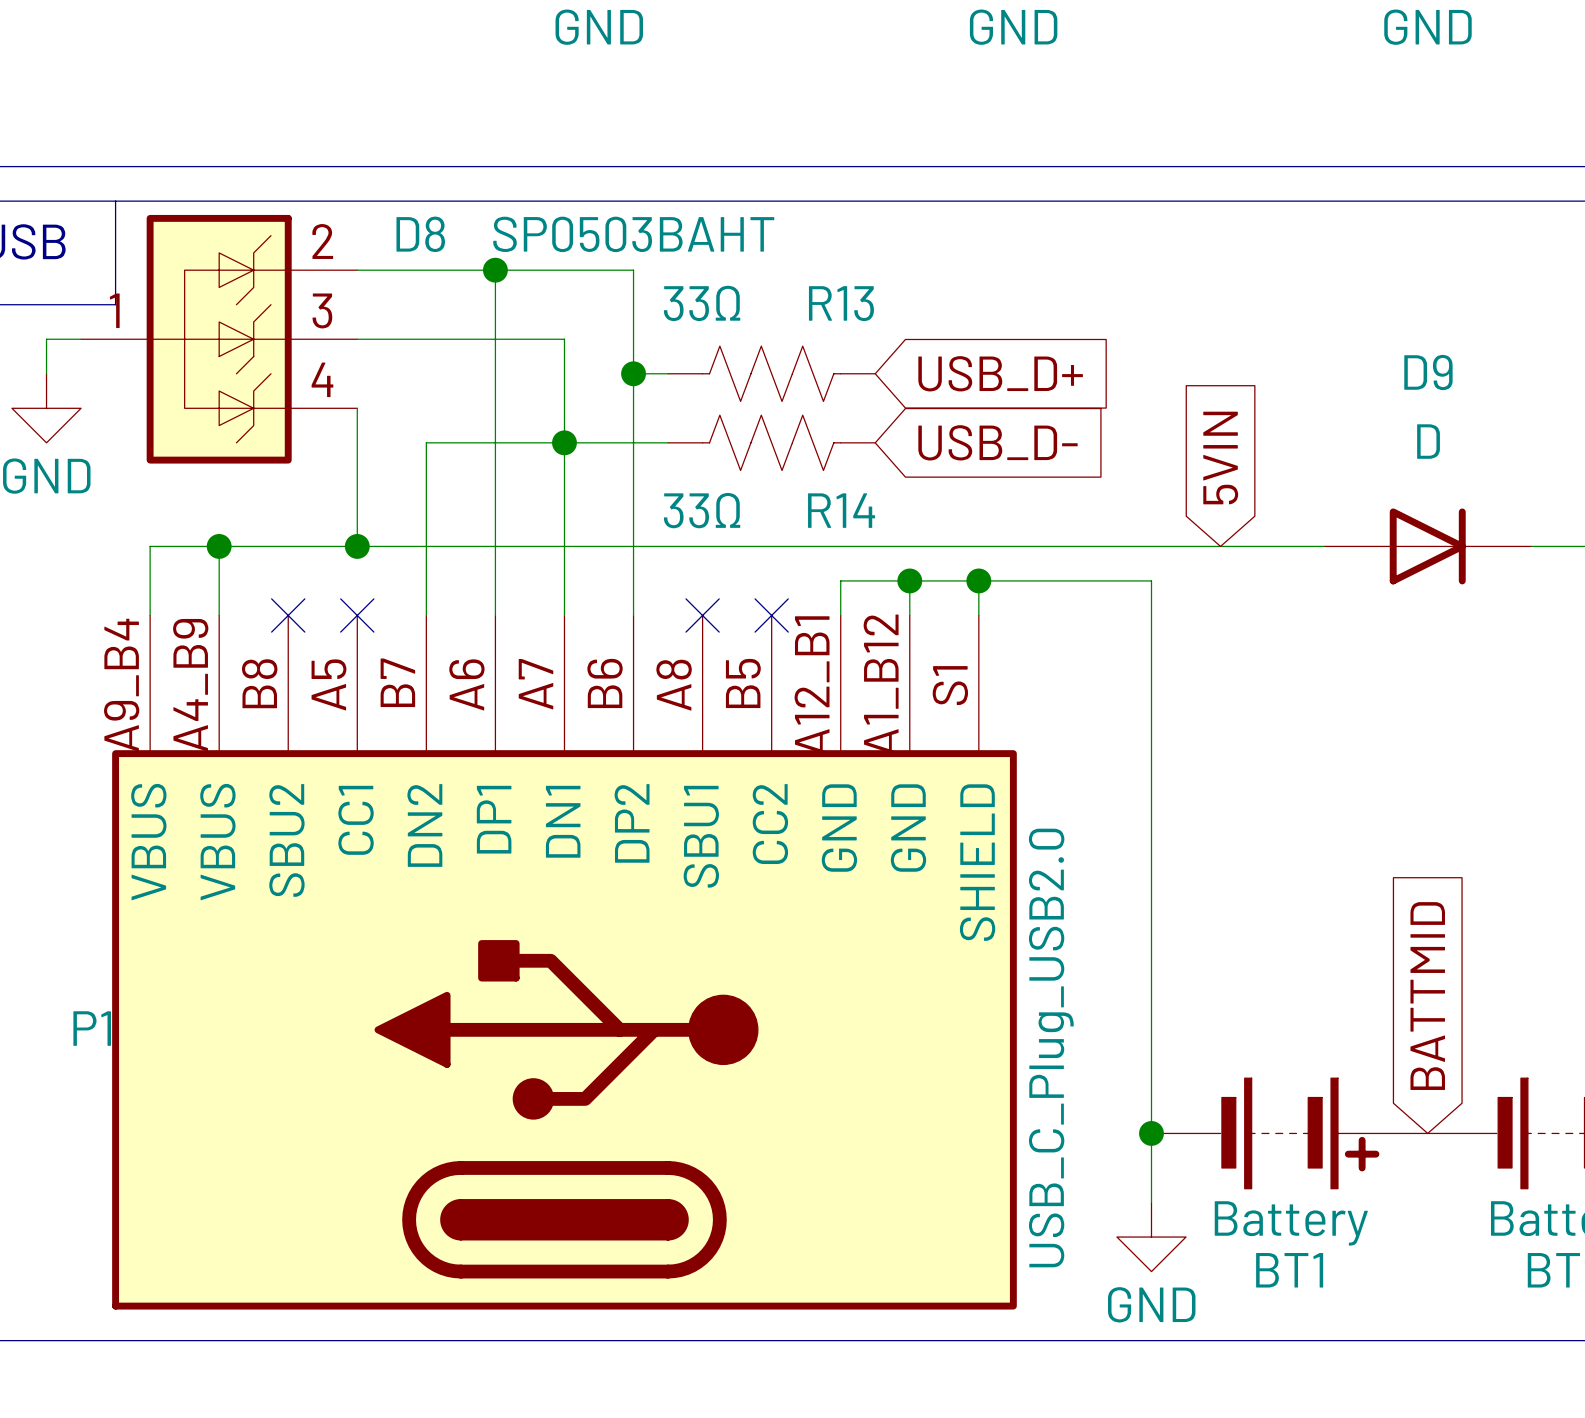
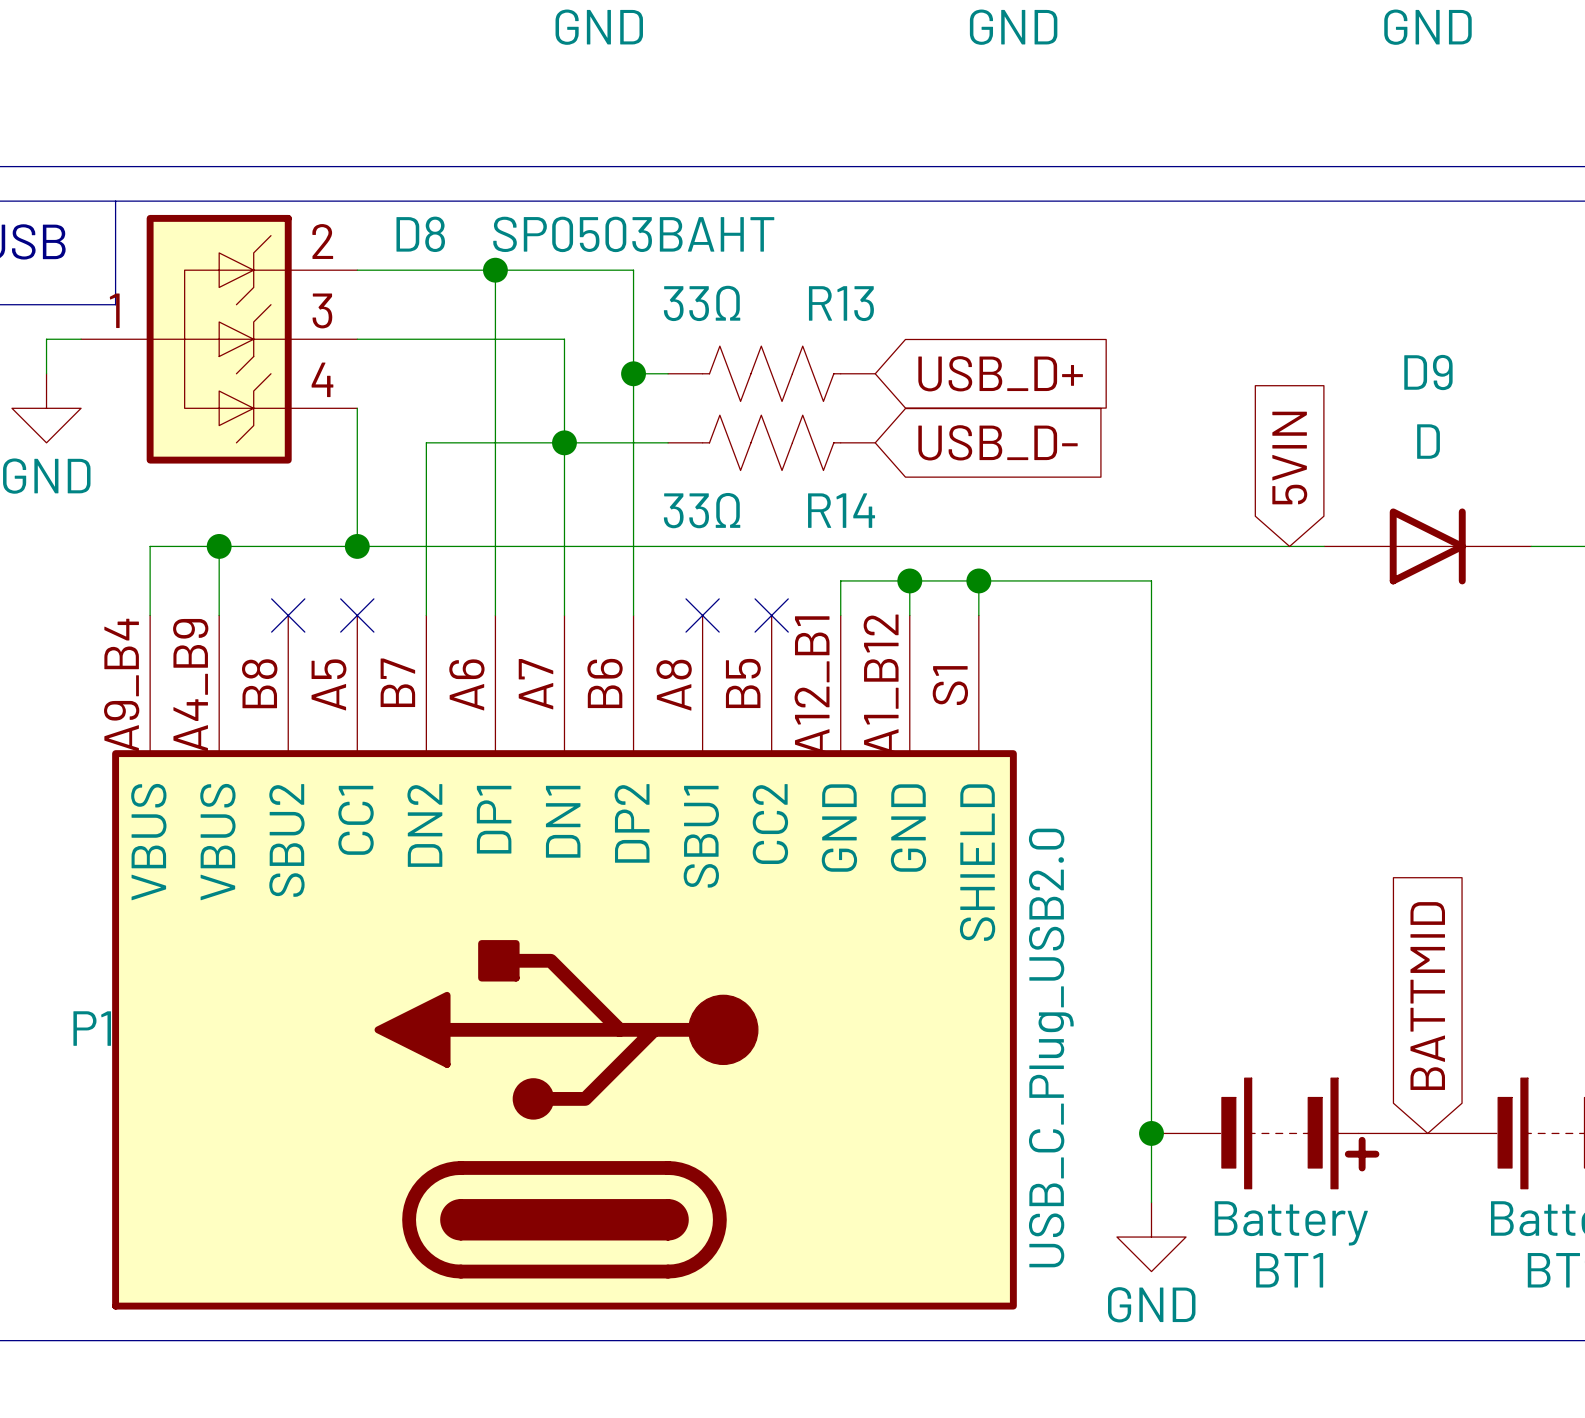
global label position: 5VIN (1220, 458) -> 5VIN (1289, 458)

